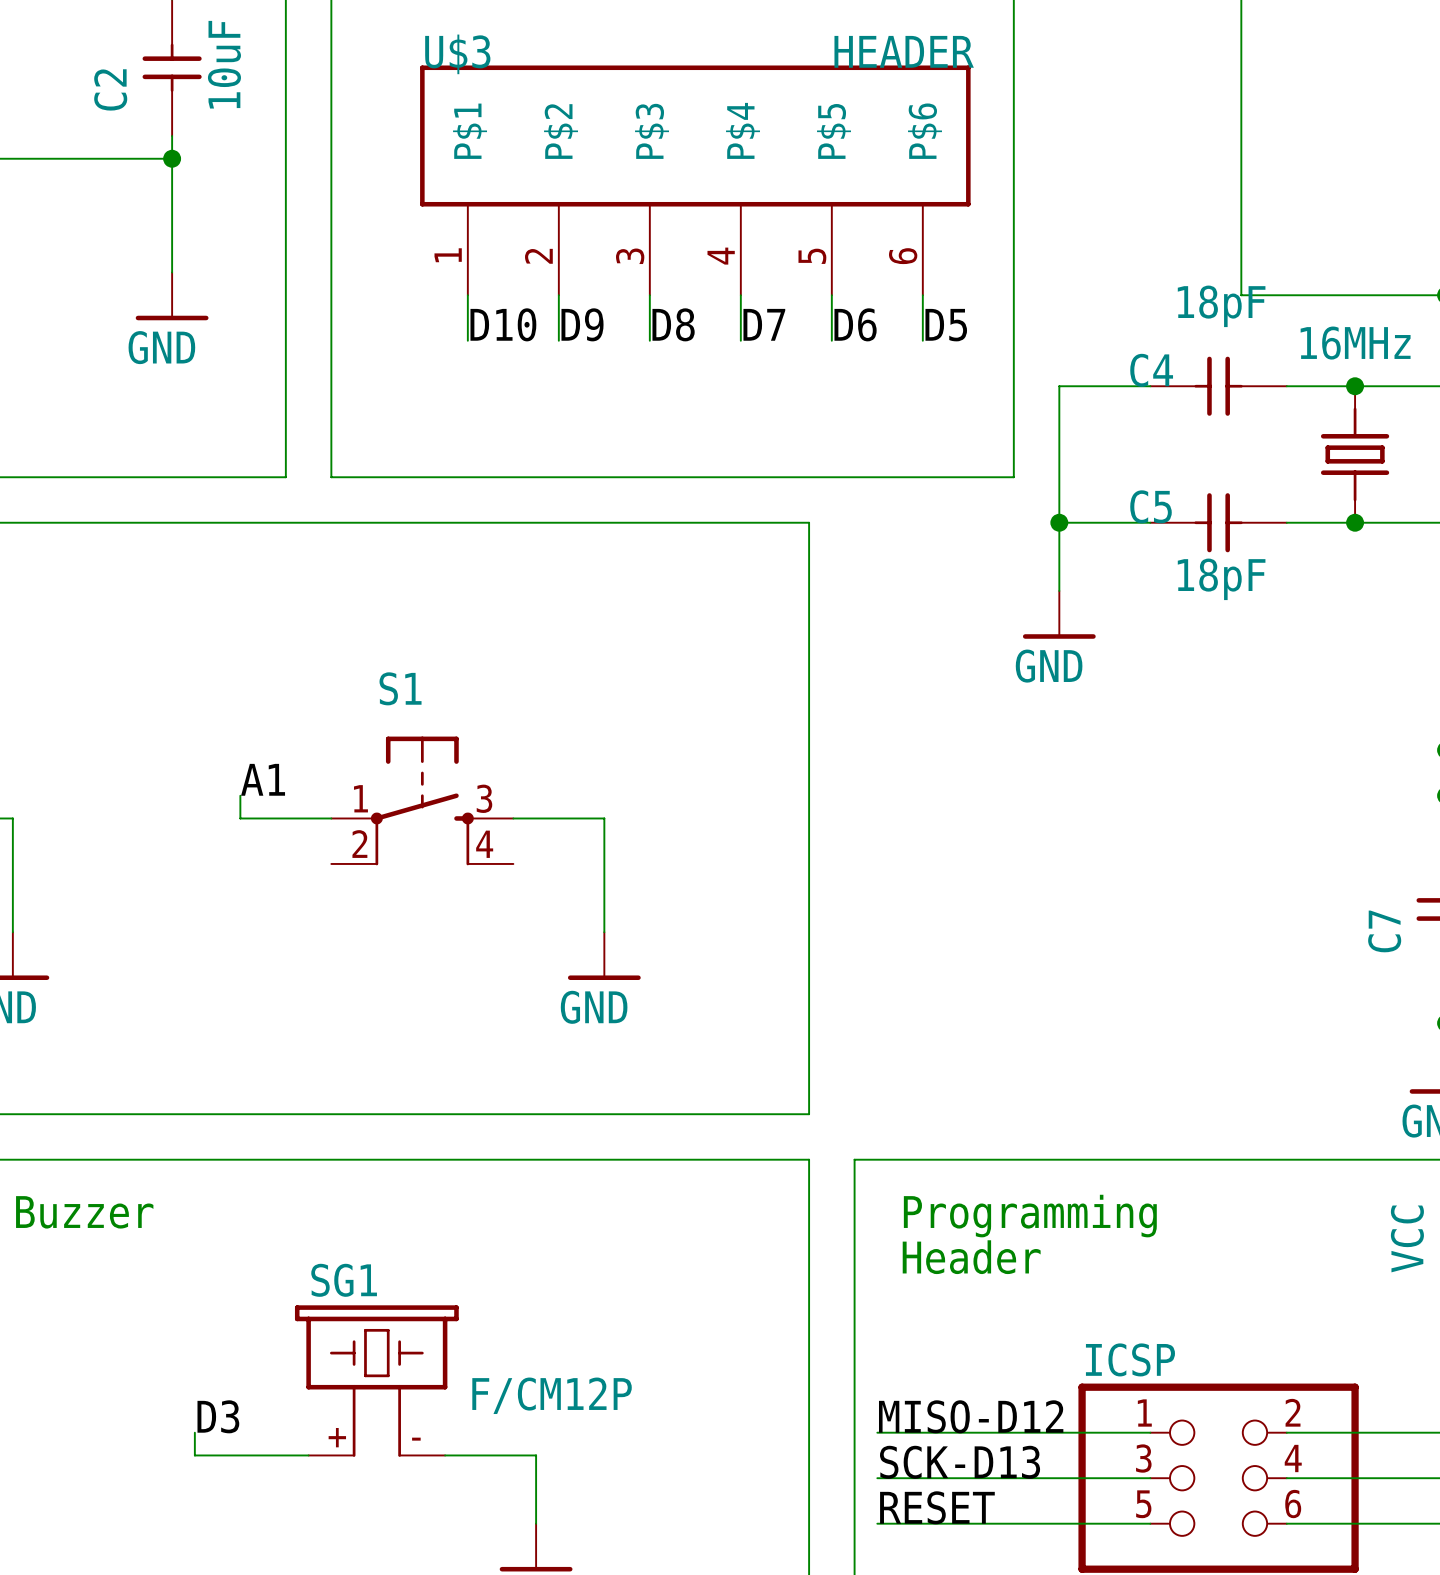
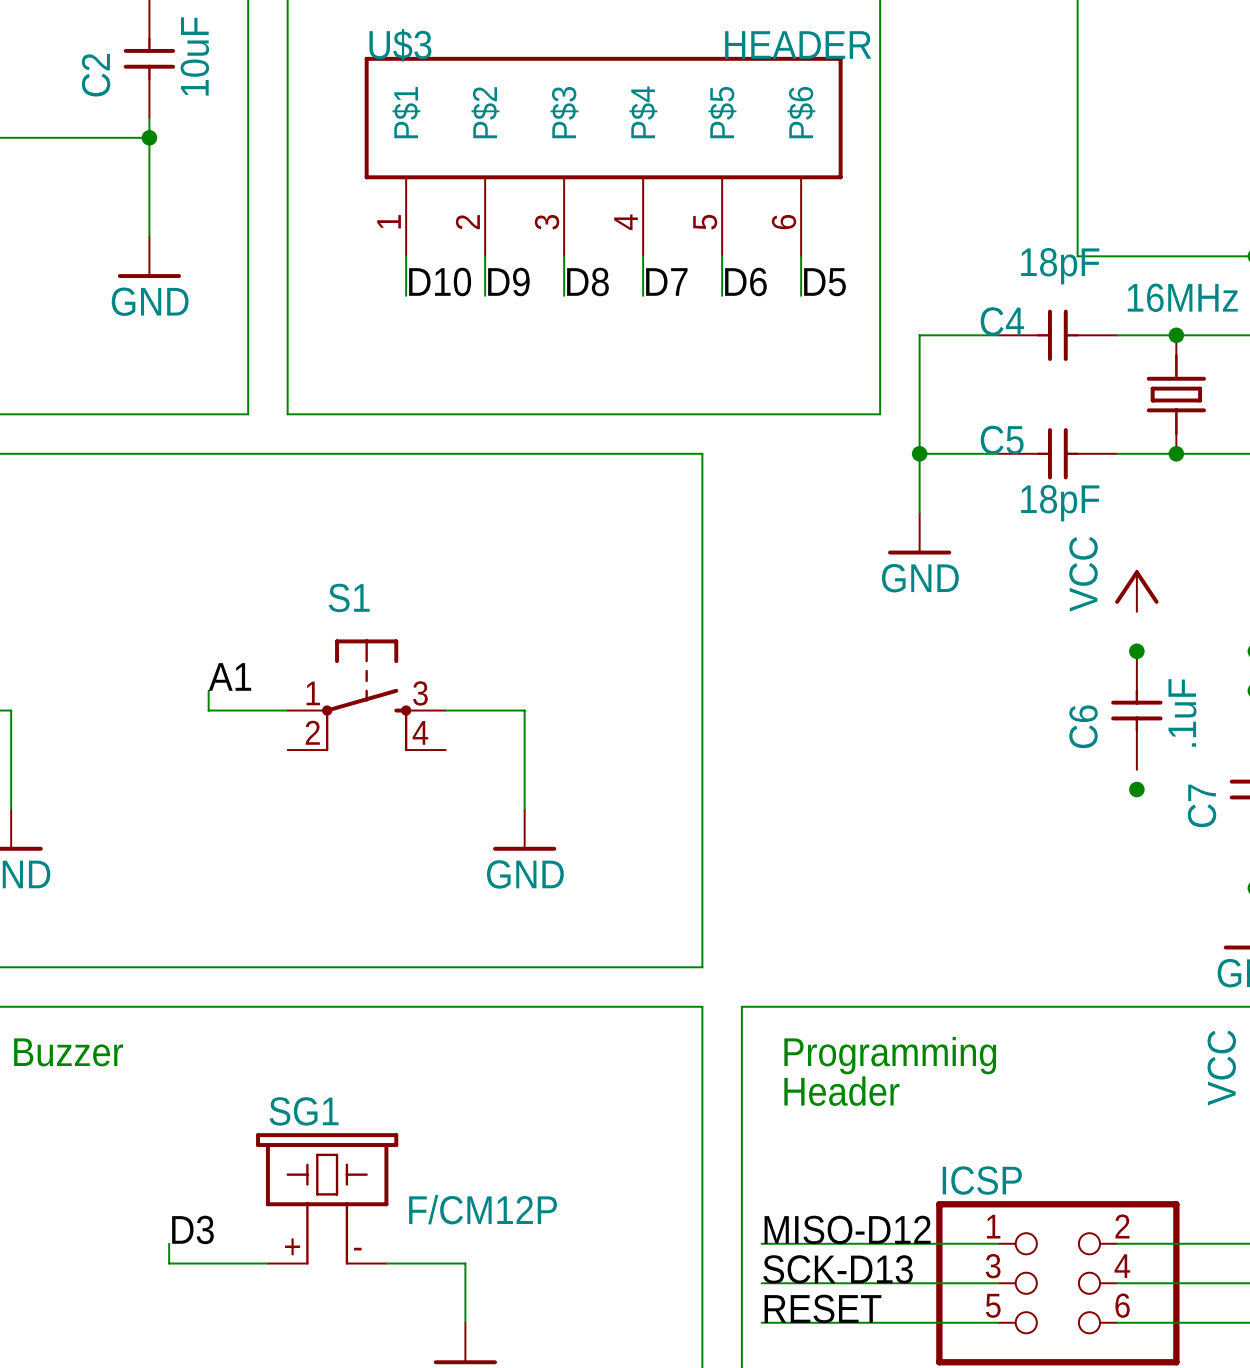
power symbol: none -> VCC (1136, 591)
junction: none -> (1136, 651)
C6: none -> .1uF (1136, 710)
junction: none -> (1136, 789)

